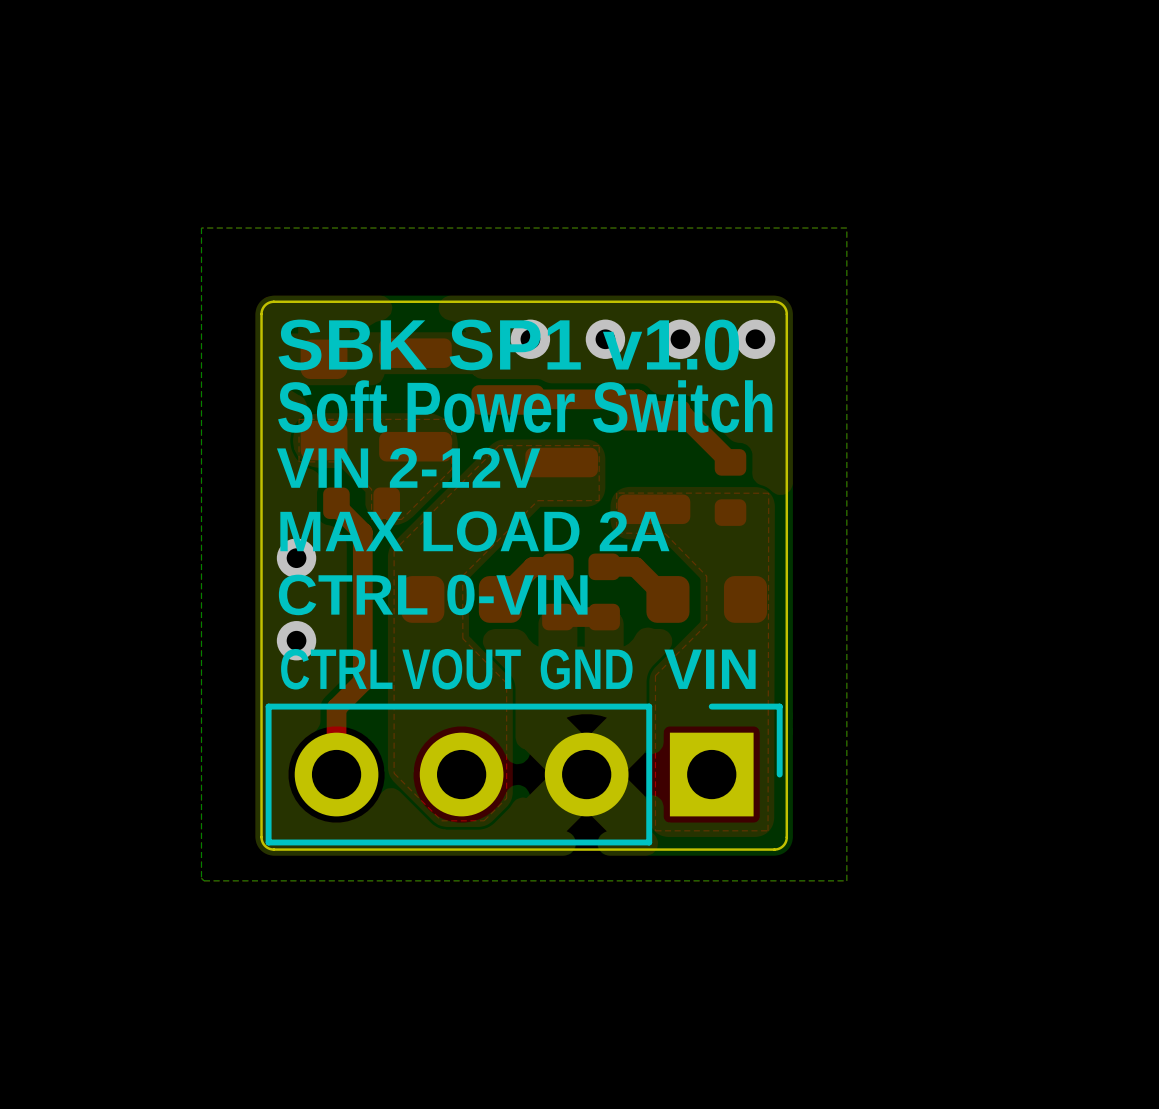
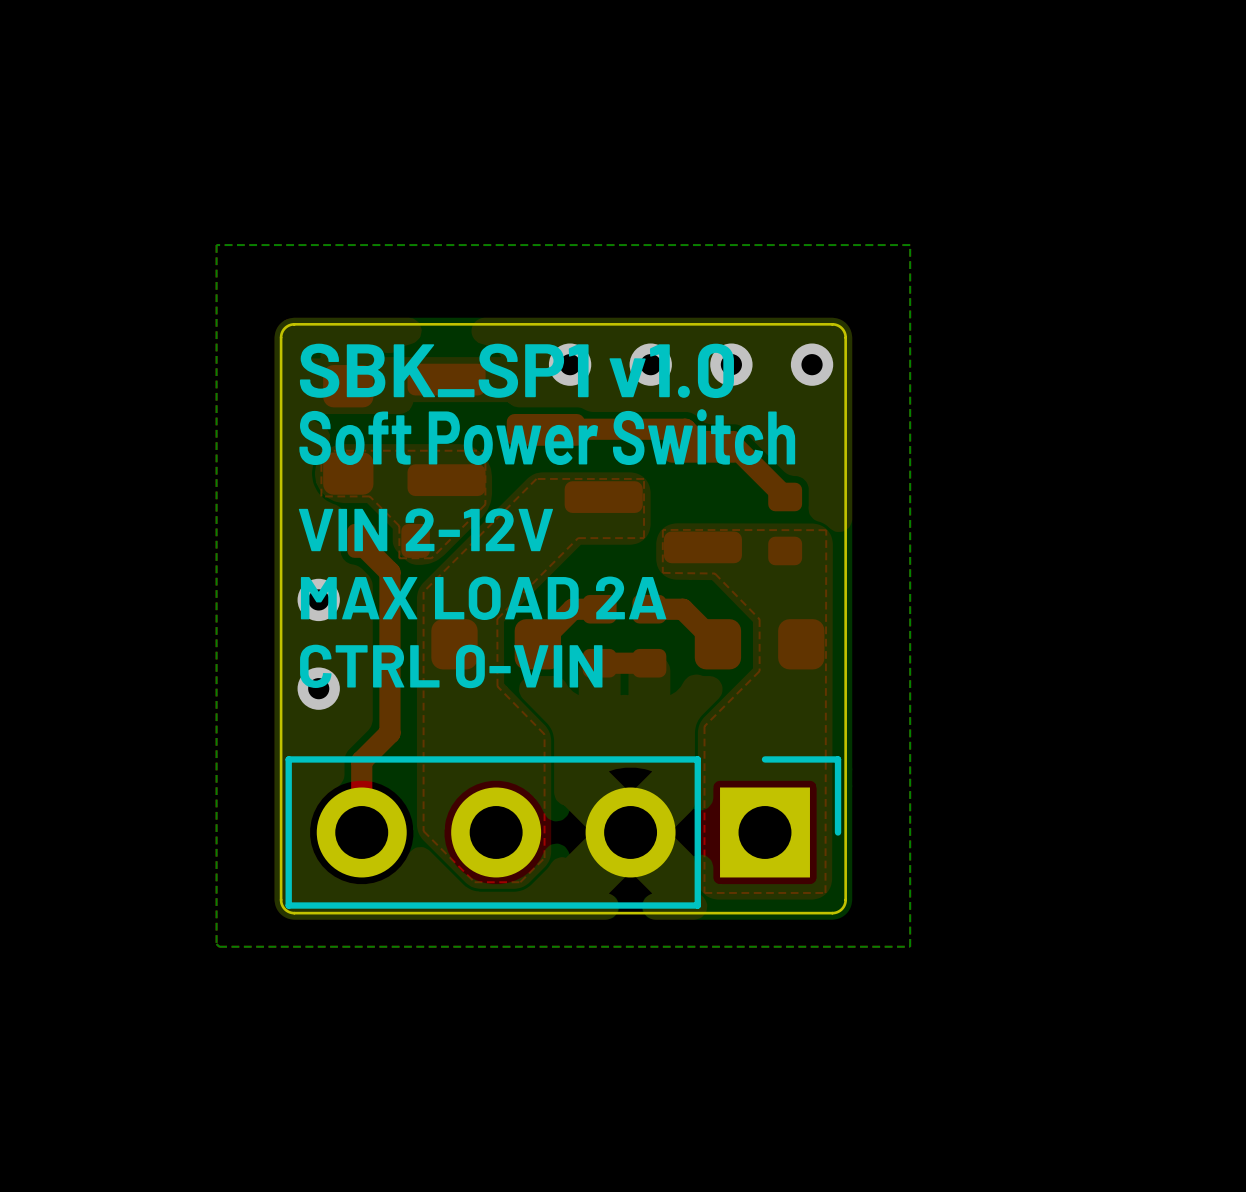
text: SBK SP1 v1.0 (508, 344) -> SBK_SP1 v1.0 (516, 370)
text position: VIN 2-12V (408, 467) -> VIN 2-12V (425, 529)
text position: MAX LOAD 2A (474, 531) -> MAX LOAD 2A (483, 598)
text position: CTRL 0-VIN (433, 594) -> CTRL 0-VIN (451, 666)
text: CTRL (336, 669) -> none
text: VOUT (461, 669) -> none
text: GND (586, 669) -> none
text: VIN (710, 669) -> none

